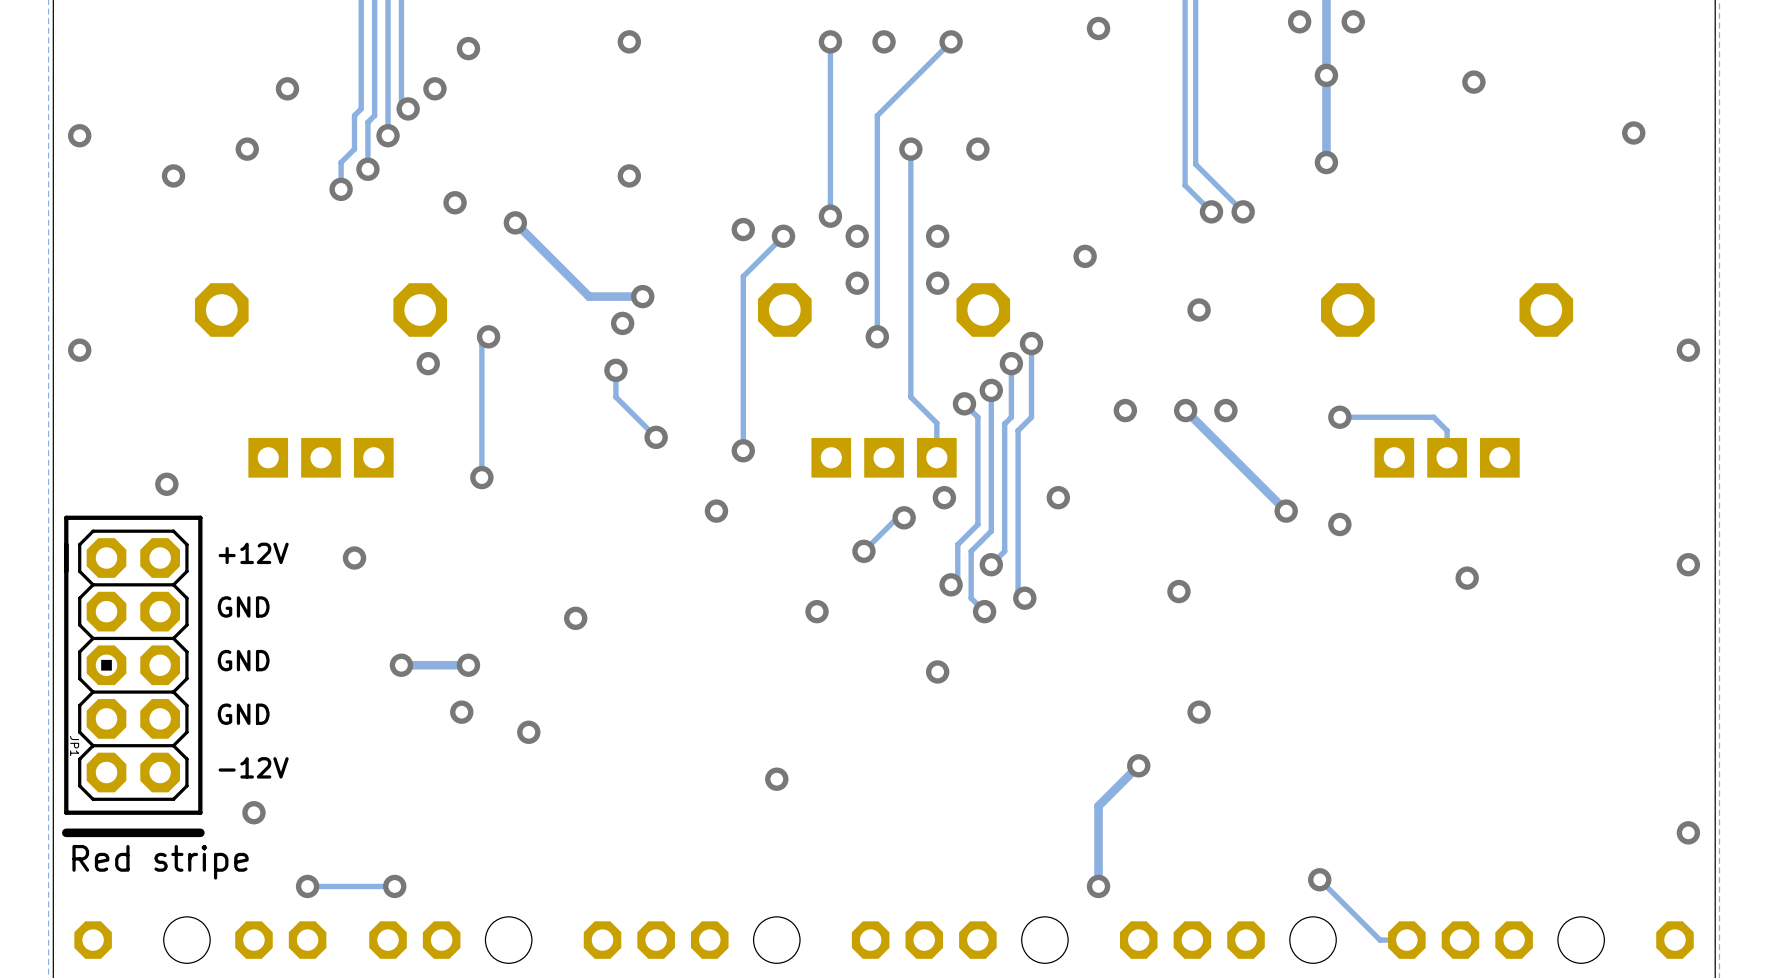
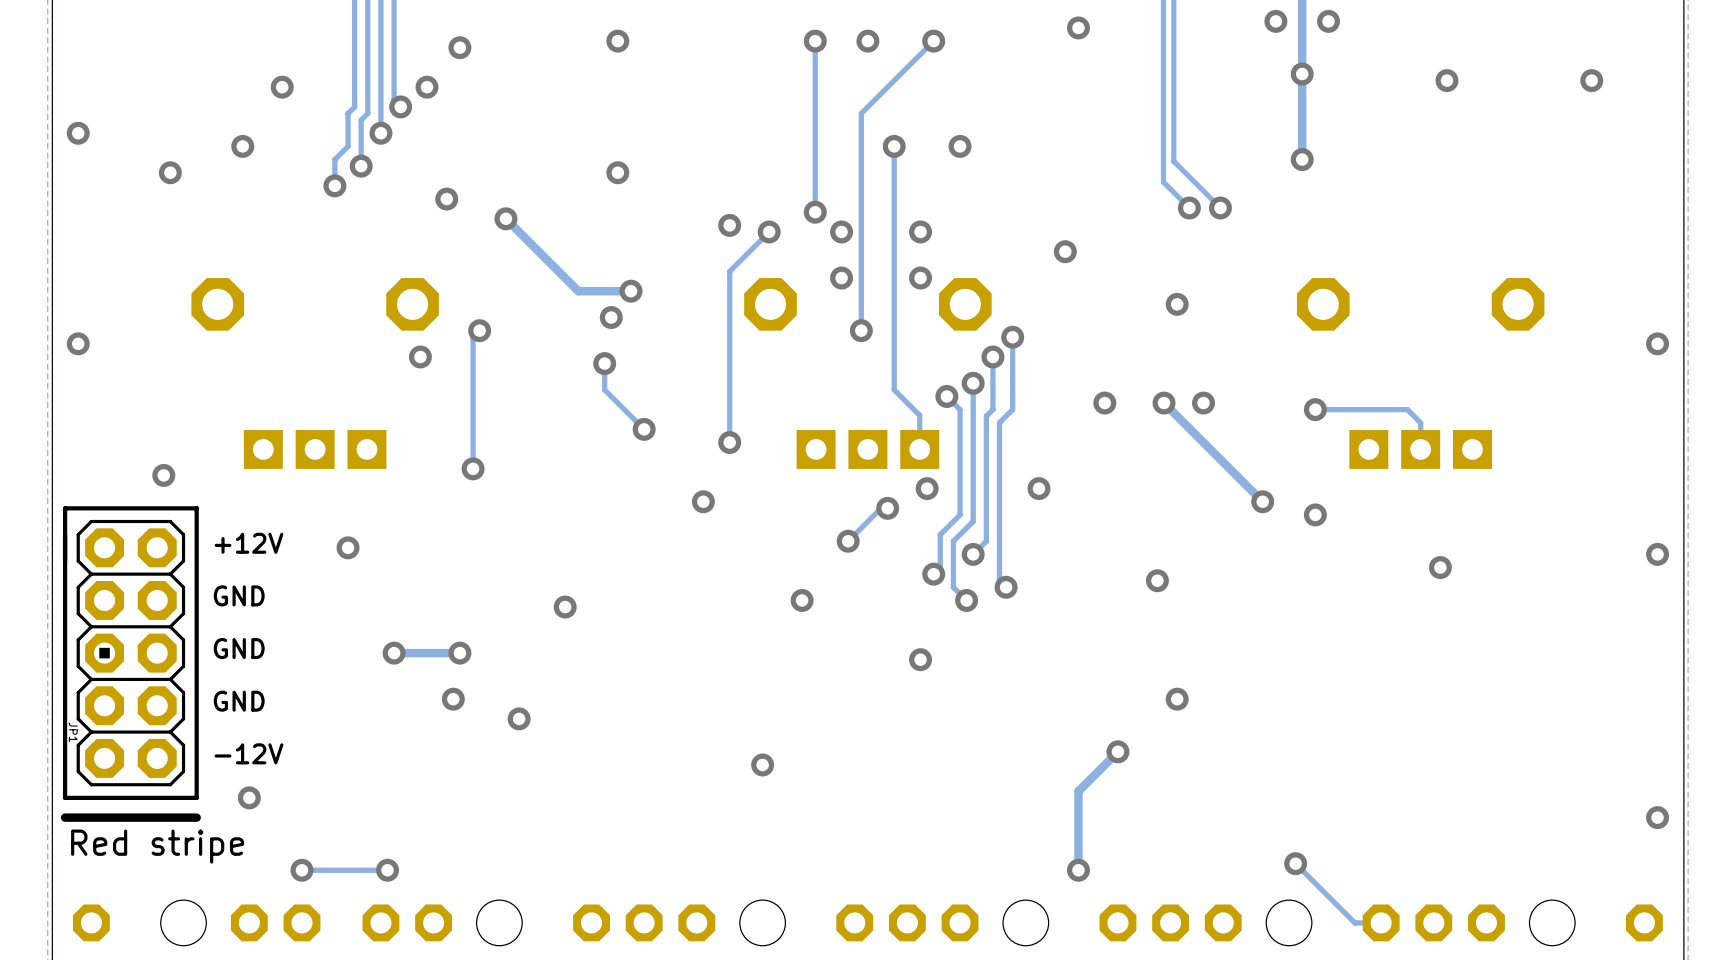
via position: (1633, 132) -> (1591, 80)

